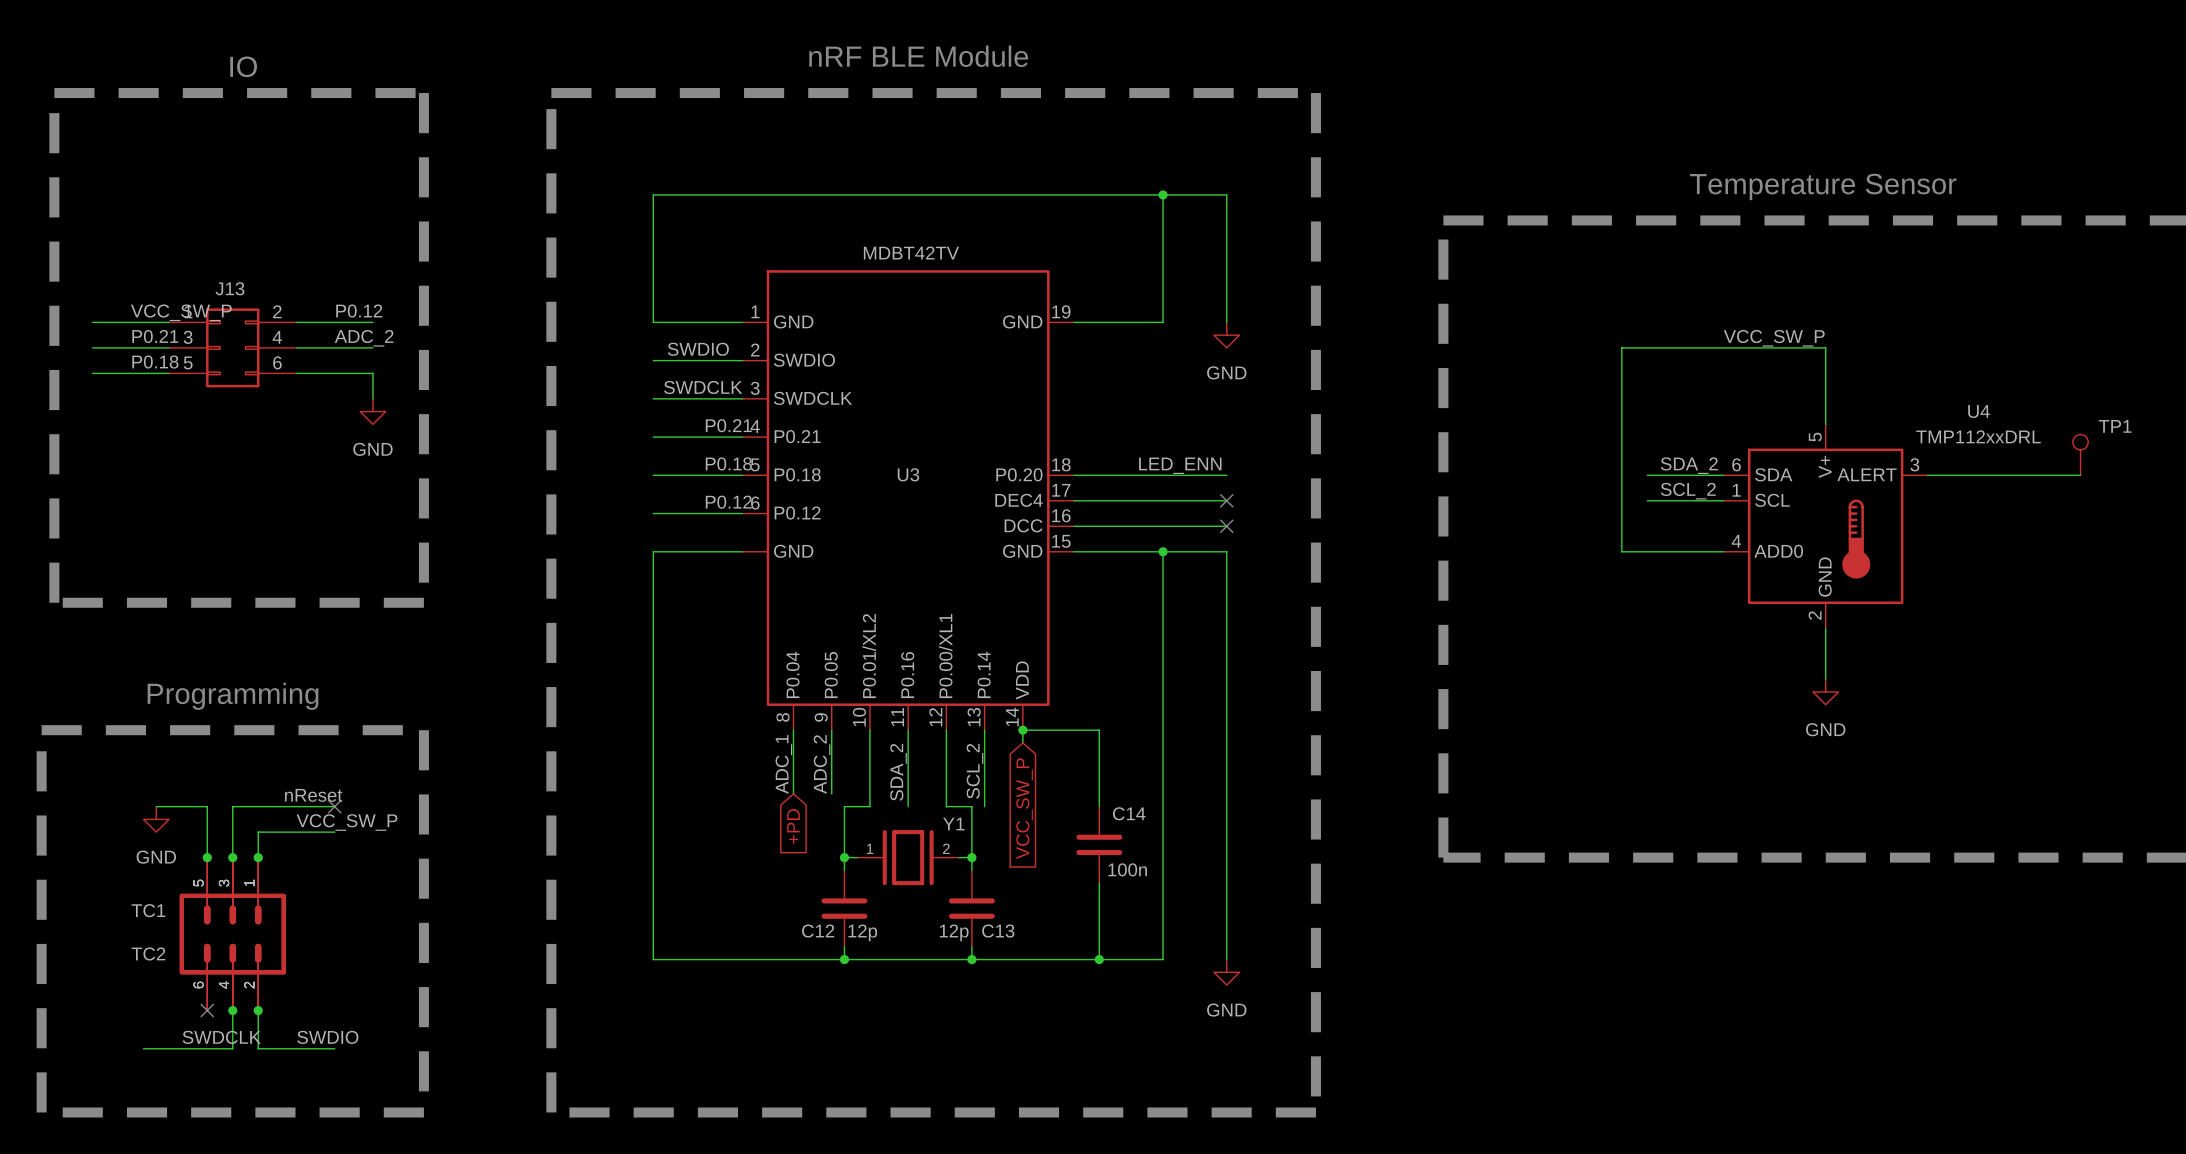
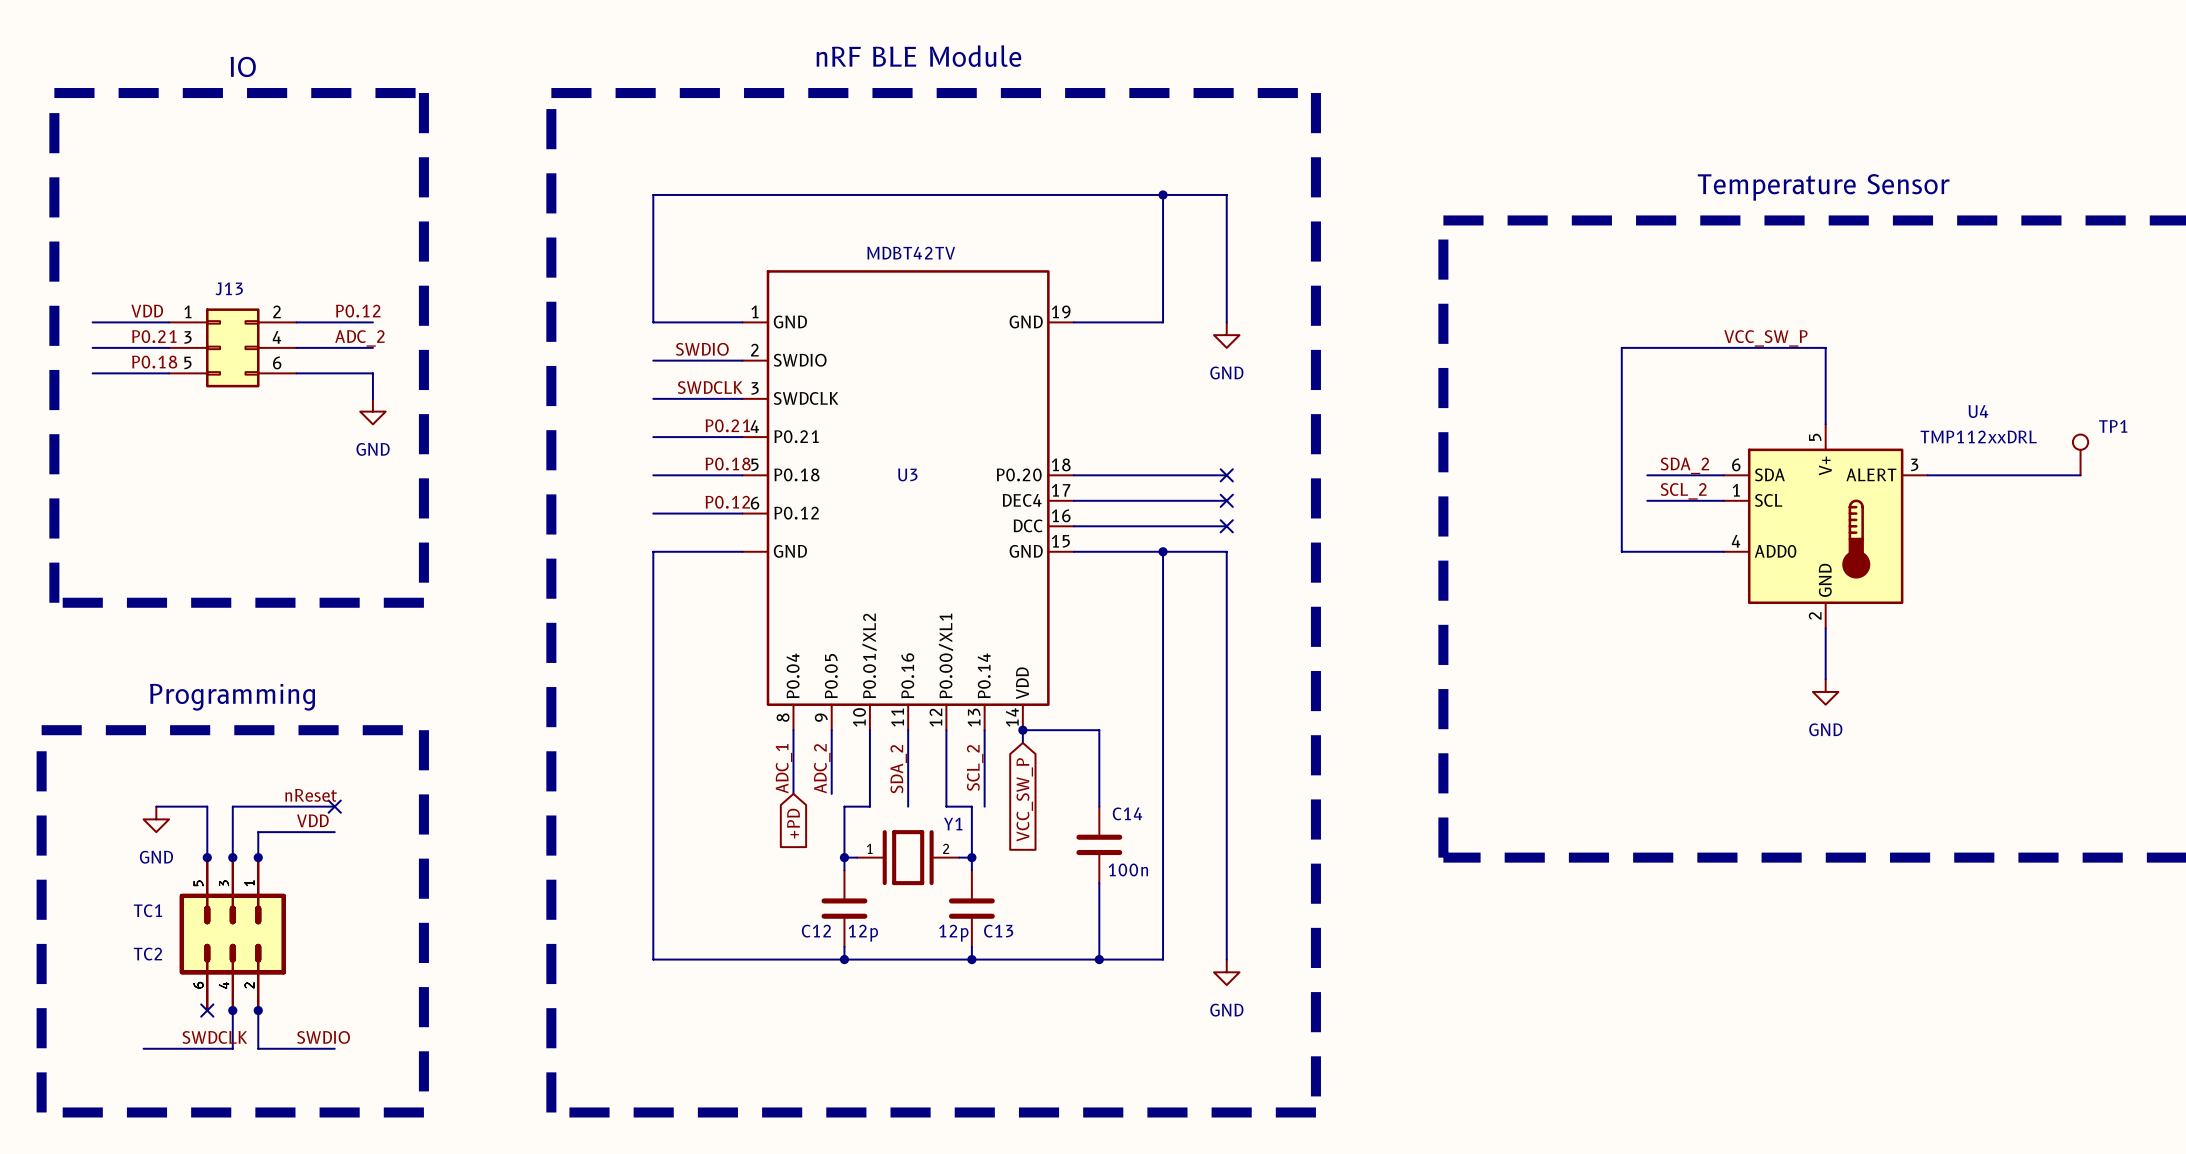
label: VCC_SW_P (181, 312) -> VDD (147, 311)
label: LED_ENN (1180, 465) -> none
no-connect mark: none -> (1226, 475)
label: VCC_SW_P (347, 822) -> VDD (312, 820)

